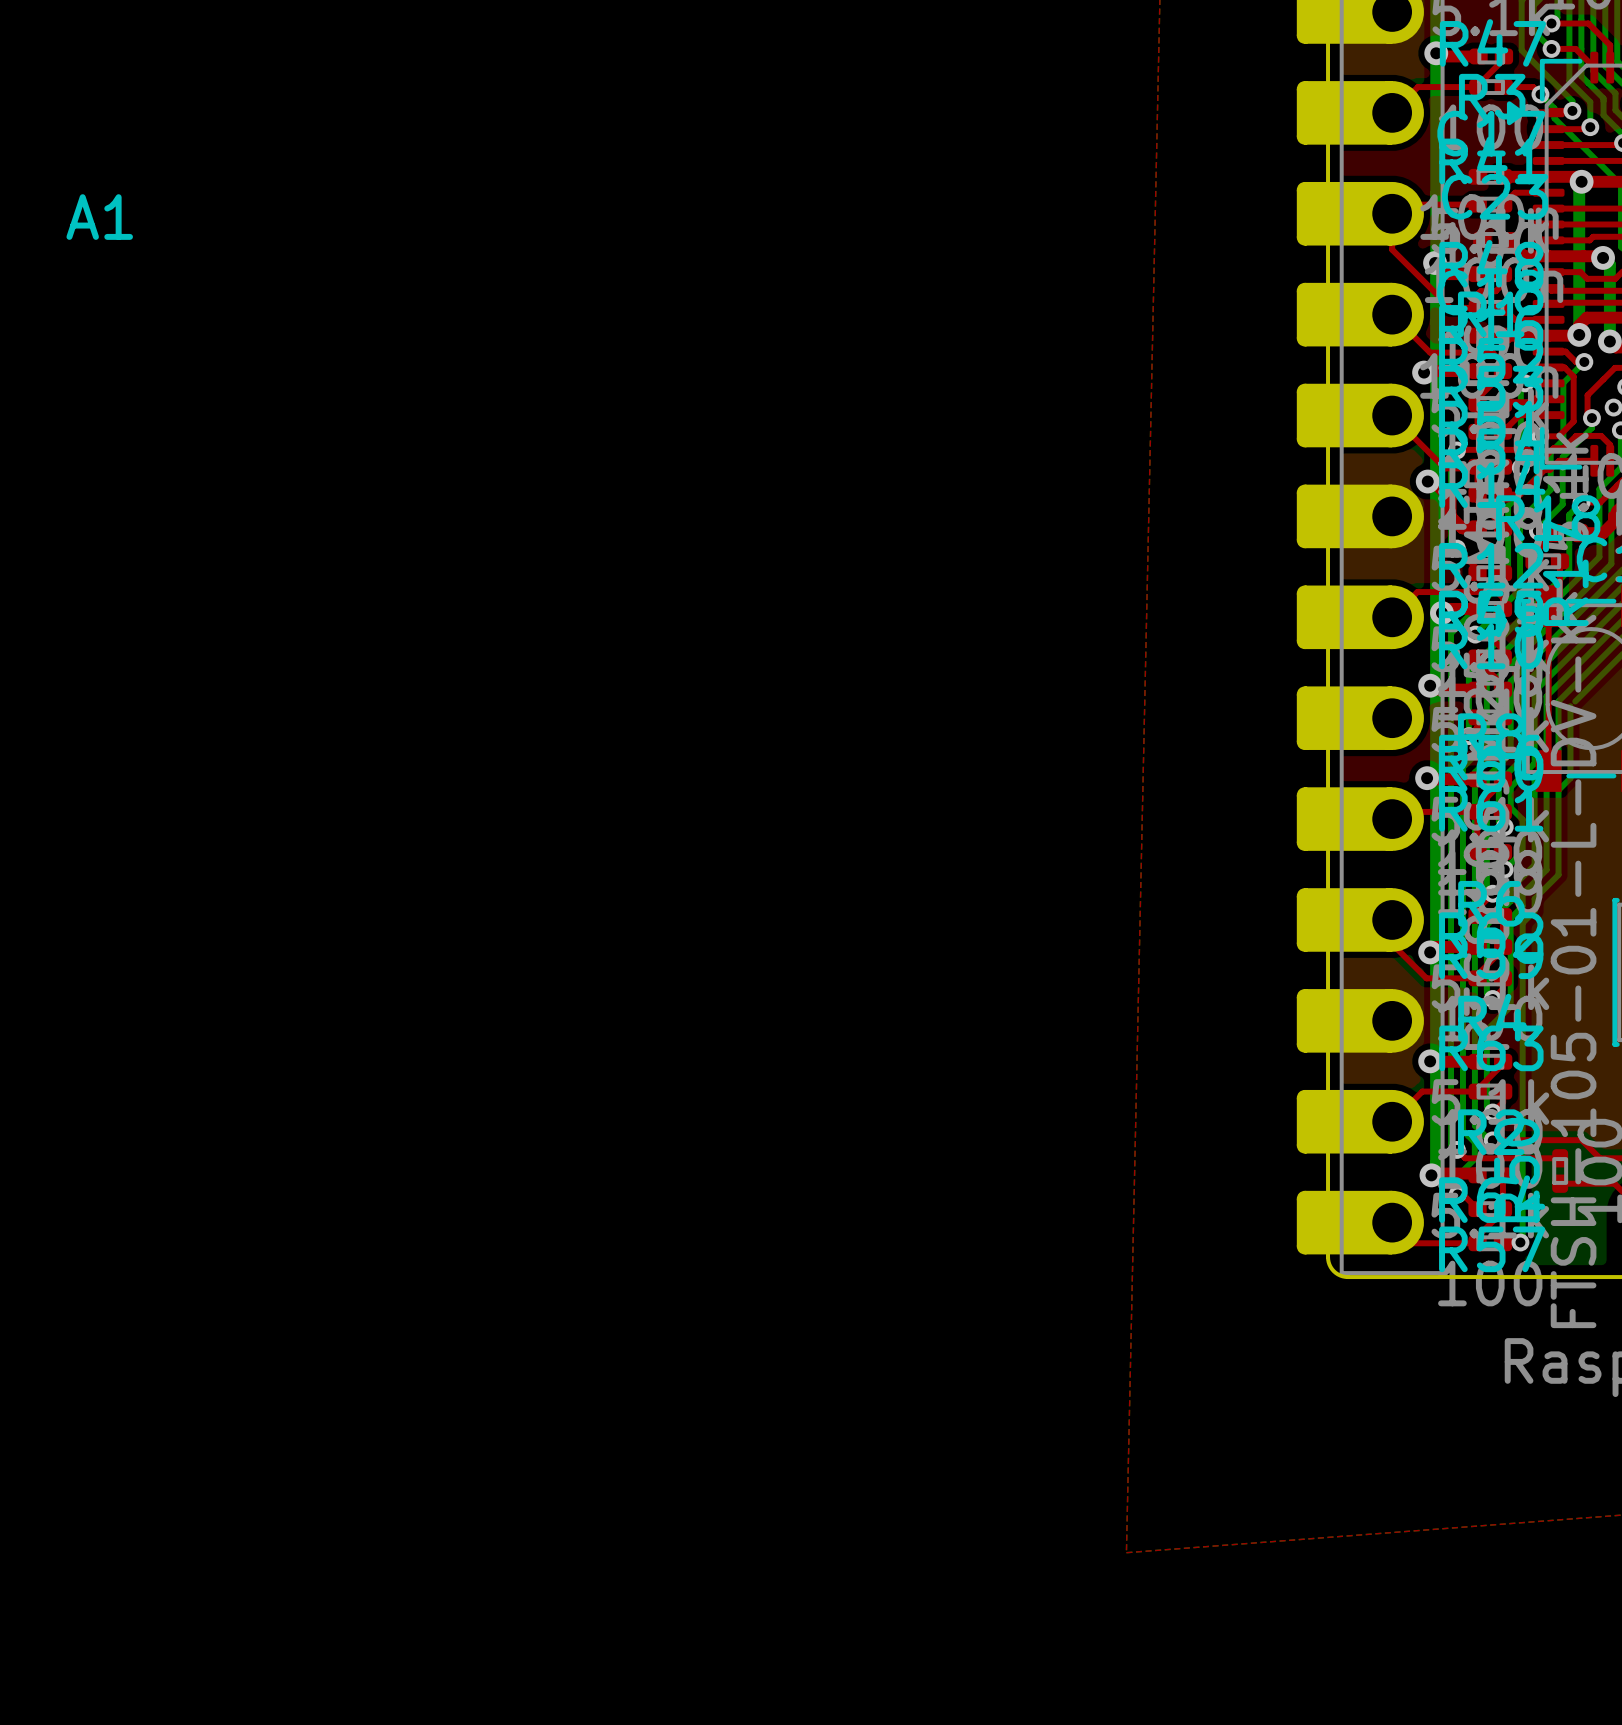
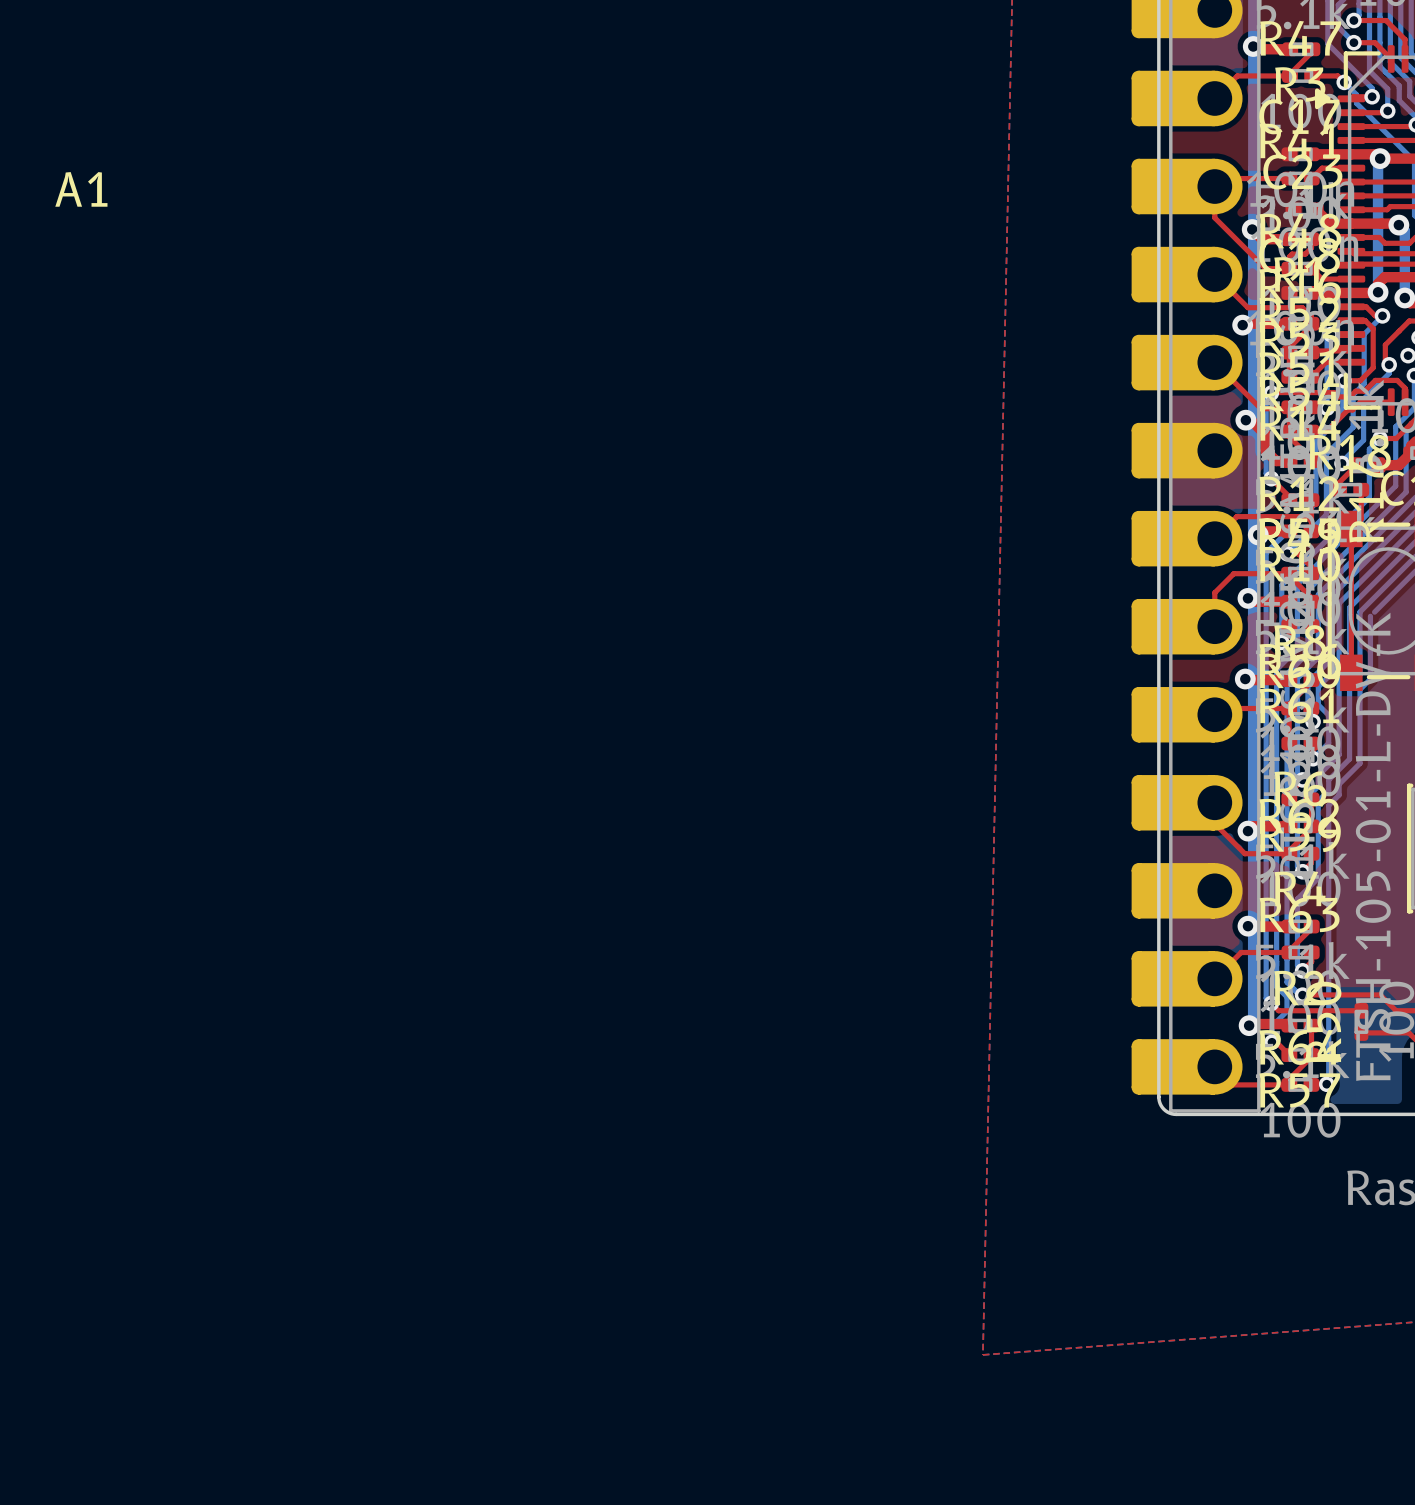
top track: none -> (1289, 573) (1233, 573) (1214, 592) (1214, 626)

